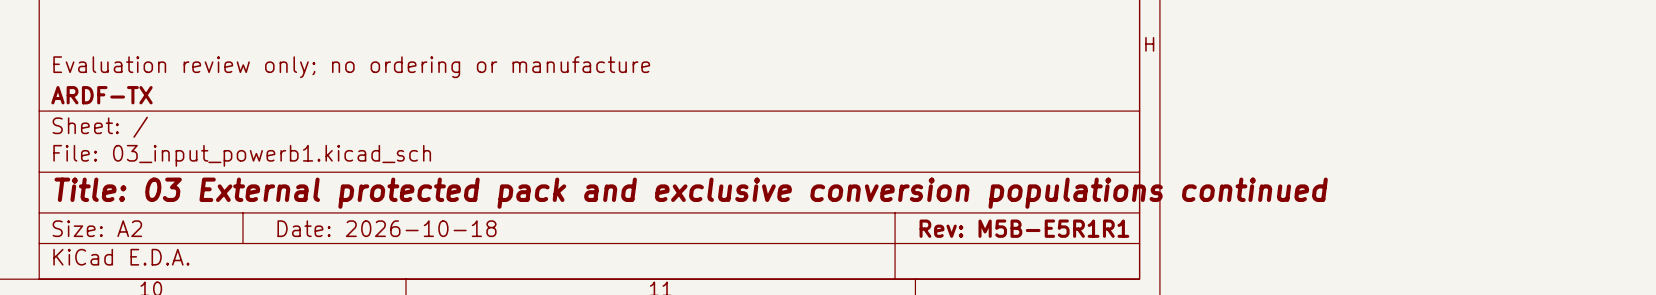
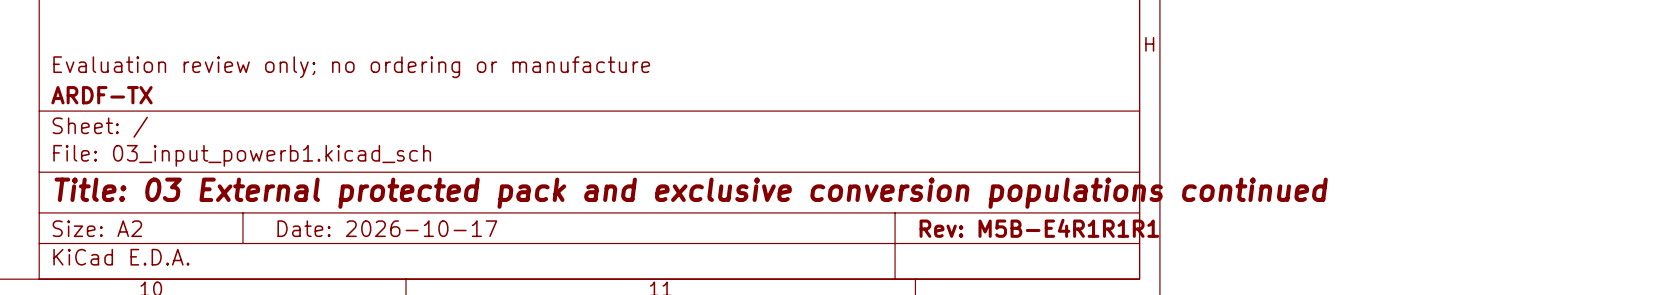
title block: Date: 2026-10-18 (387, 228) -> Date: 2026-10-17 (387, 228)
title block: Rev: M5B-E5R1R1 (1024, 228) -> Rev: M5B-E4R1R1R1 (1039, 228)

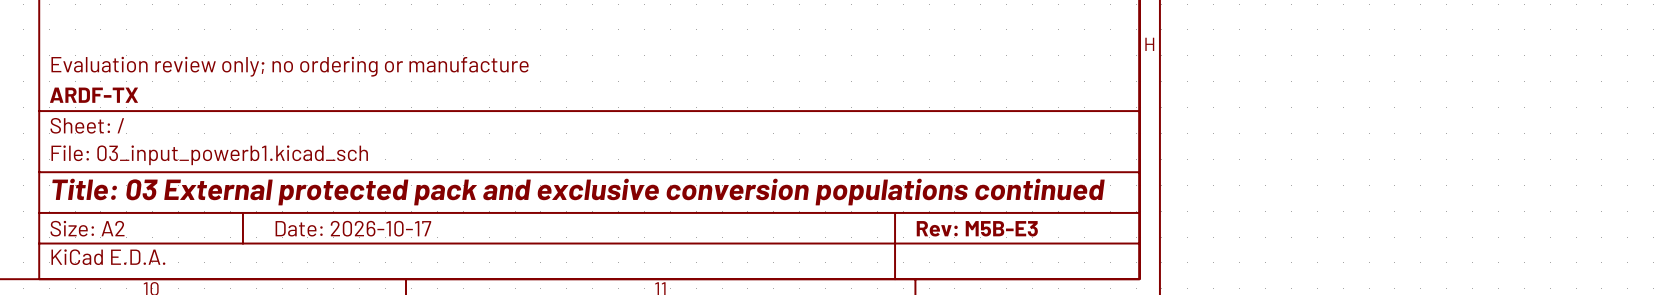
title block: Rev: M5B-E4R1R1R1 (1039, 228) -> Rev: M5B-E3 (977, 228)

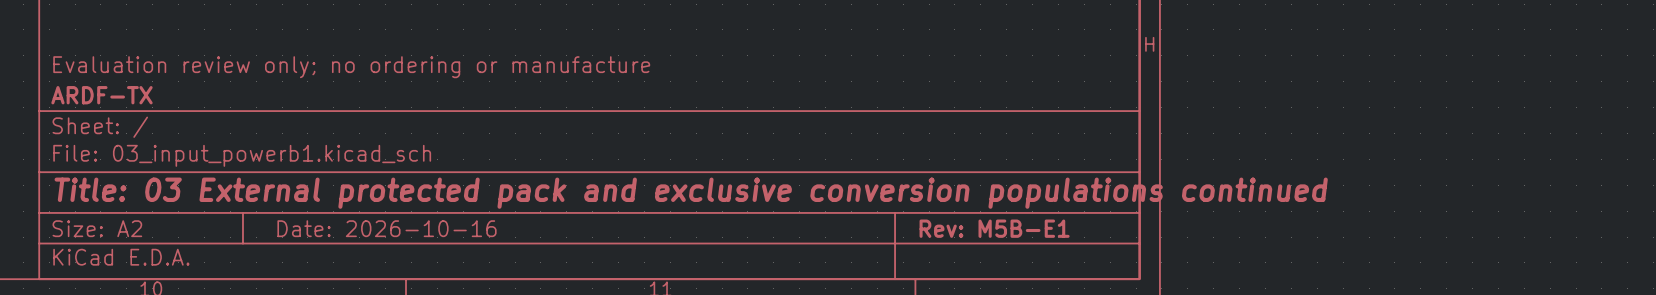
title block: Date: 2026-10-17 (353, 228) -> Date: 2026-10-16 (387, 228)
title block: Rev: M5B-E3 (977, 228) -> Rev: M5B-E1 (994, 228)

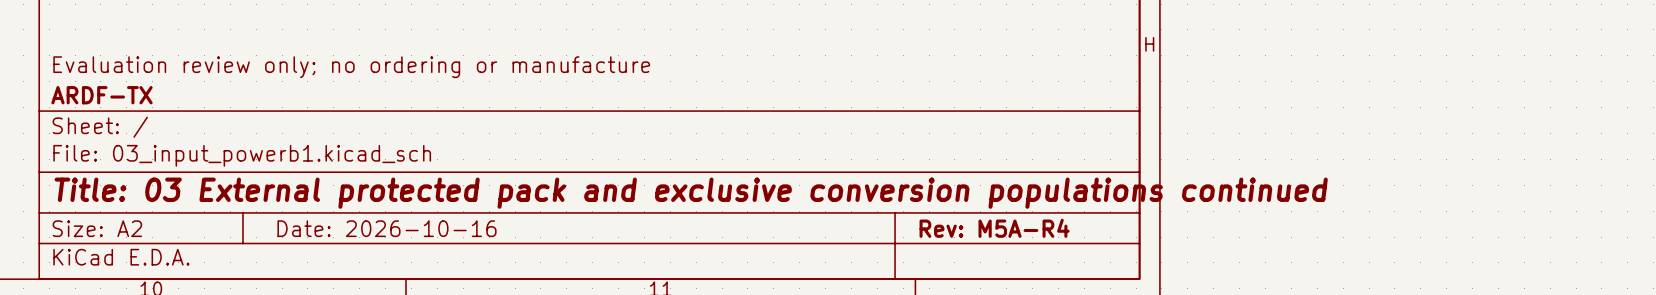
title block: Rev: M5B-E1 (994, 228) -> Rev: M5A-R4 (994, 228)

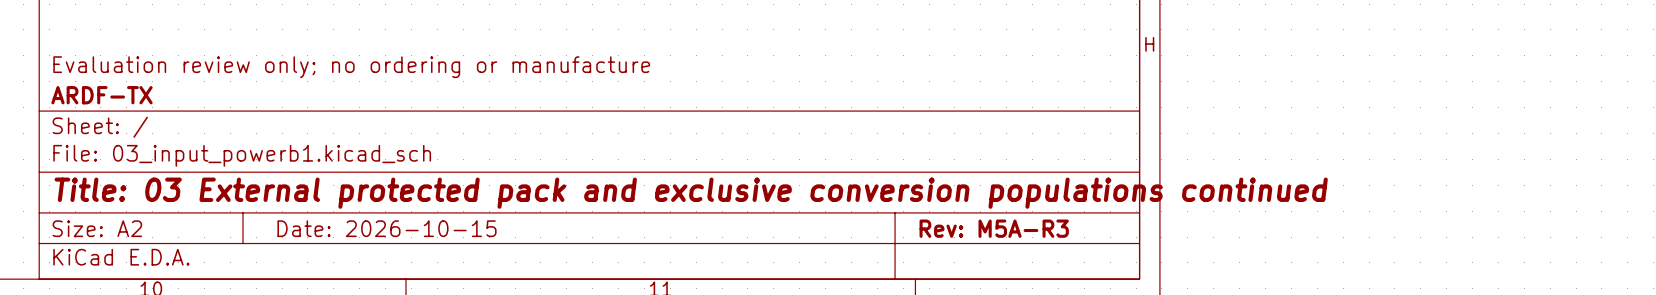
title block: Date: 2026-10-16 (387, 228) -> Date: 2026-10-15 (387, 228)
title block: Rev: M5A-R4 (994, 228) -> Rev: M5A-R3 (994, 228)

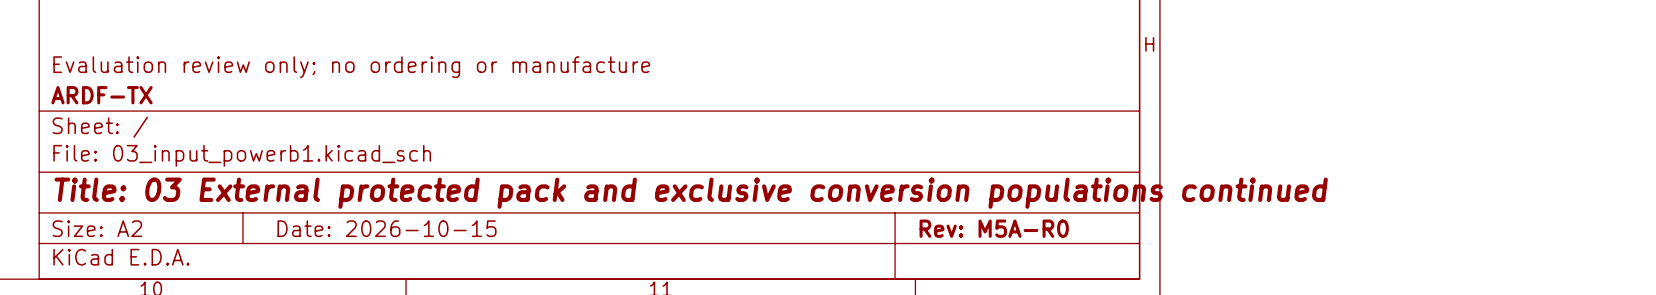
title block: Rev: M5A-R3 (994, 228) -> Rev: M5A-R0 (994, 228)

